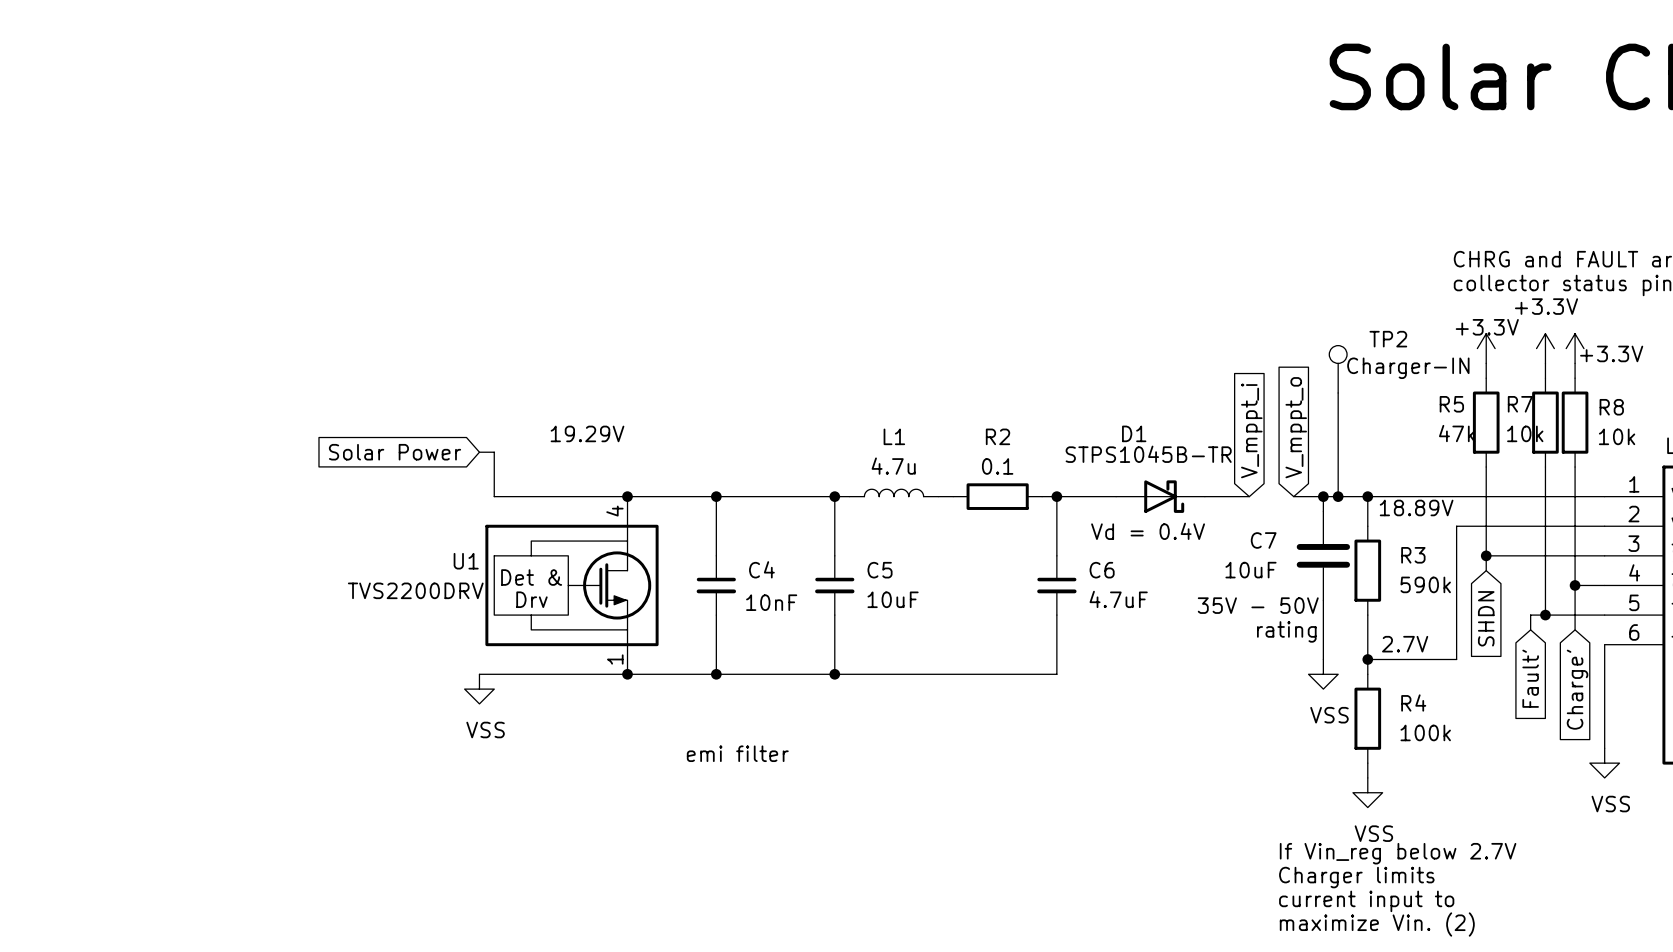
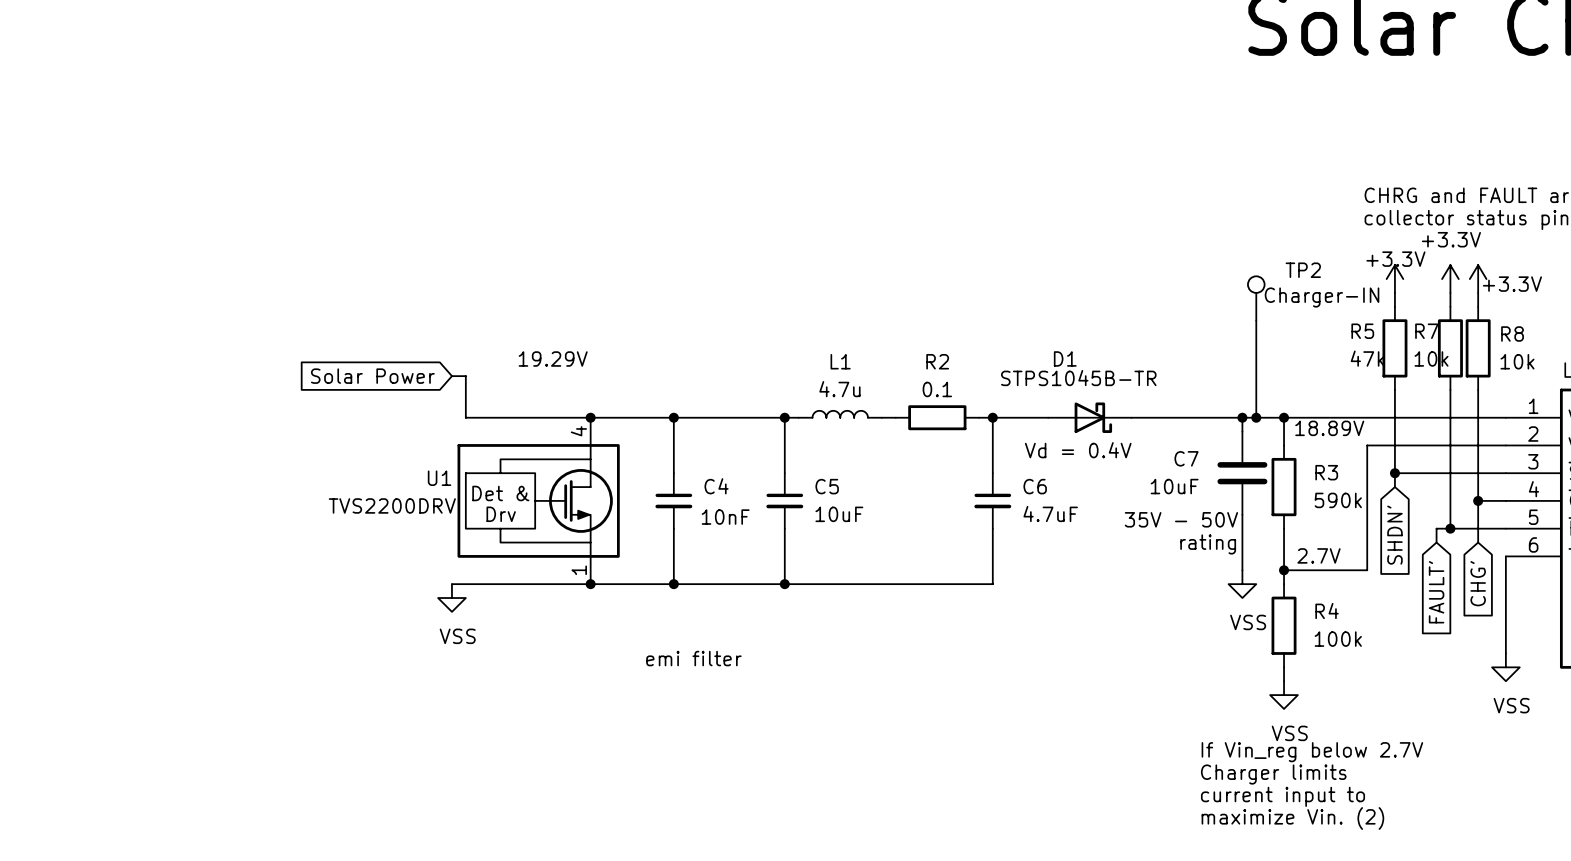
global label: V_mppt_o (1296, 427) -> none
global label: V_mppt_i (1251, 430) -> none
wire: none -> (1173, 417) (1214, 417)
global label: SHDN (1486, 618) -> SHDN' (1394, 535)
global label: Fault' (1530, 678) -> FAULT' (1436, 592)
global label: Charge' (1577, 689) -> CHG' (1478, 583)

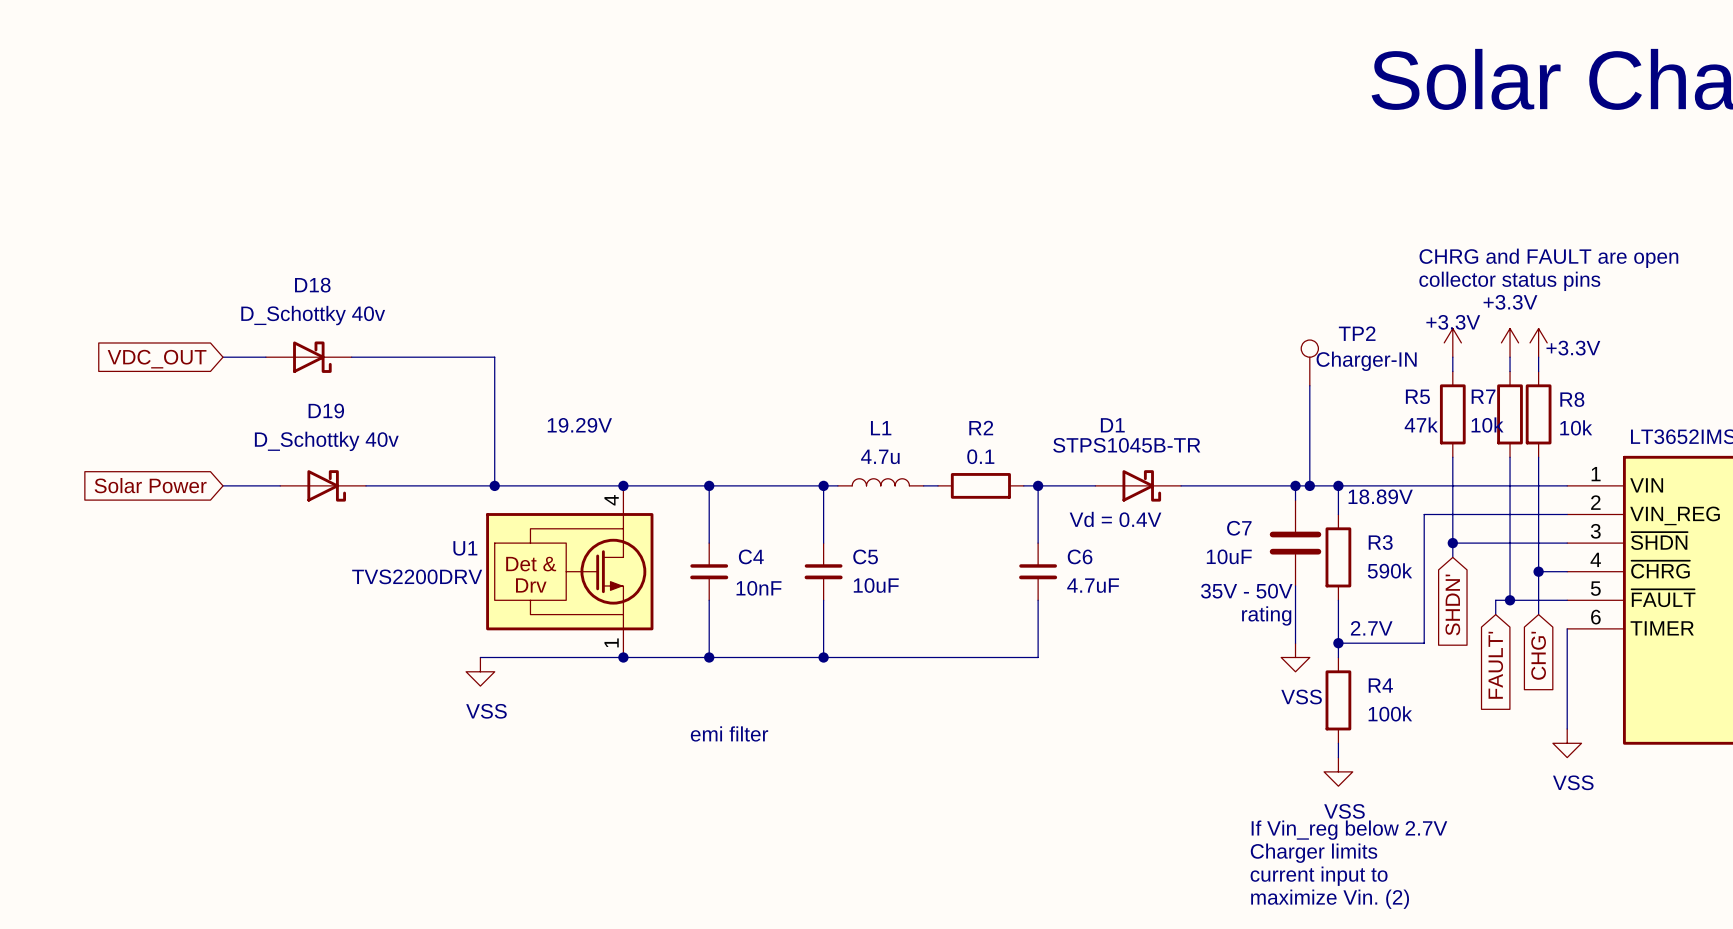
wire: none -> (223, 357) (265, 357)
D18: none -> D_Schottky 40v (308, 357)
global label: none -> VDC_OUT (157, 359)
global label position: Solar Power (372, 376) -> Solar Power (150, 485)
wire: (451, 376) (465, 376) -> (351, 357) (494, 357) (494, 442)
wire: none -> (223, 485) (280, 485)
D19: none -> D_Schottky 40v (323, 485)
wire: none -> (366, 485) (494, 485)
junction: none -> (494, 485)

